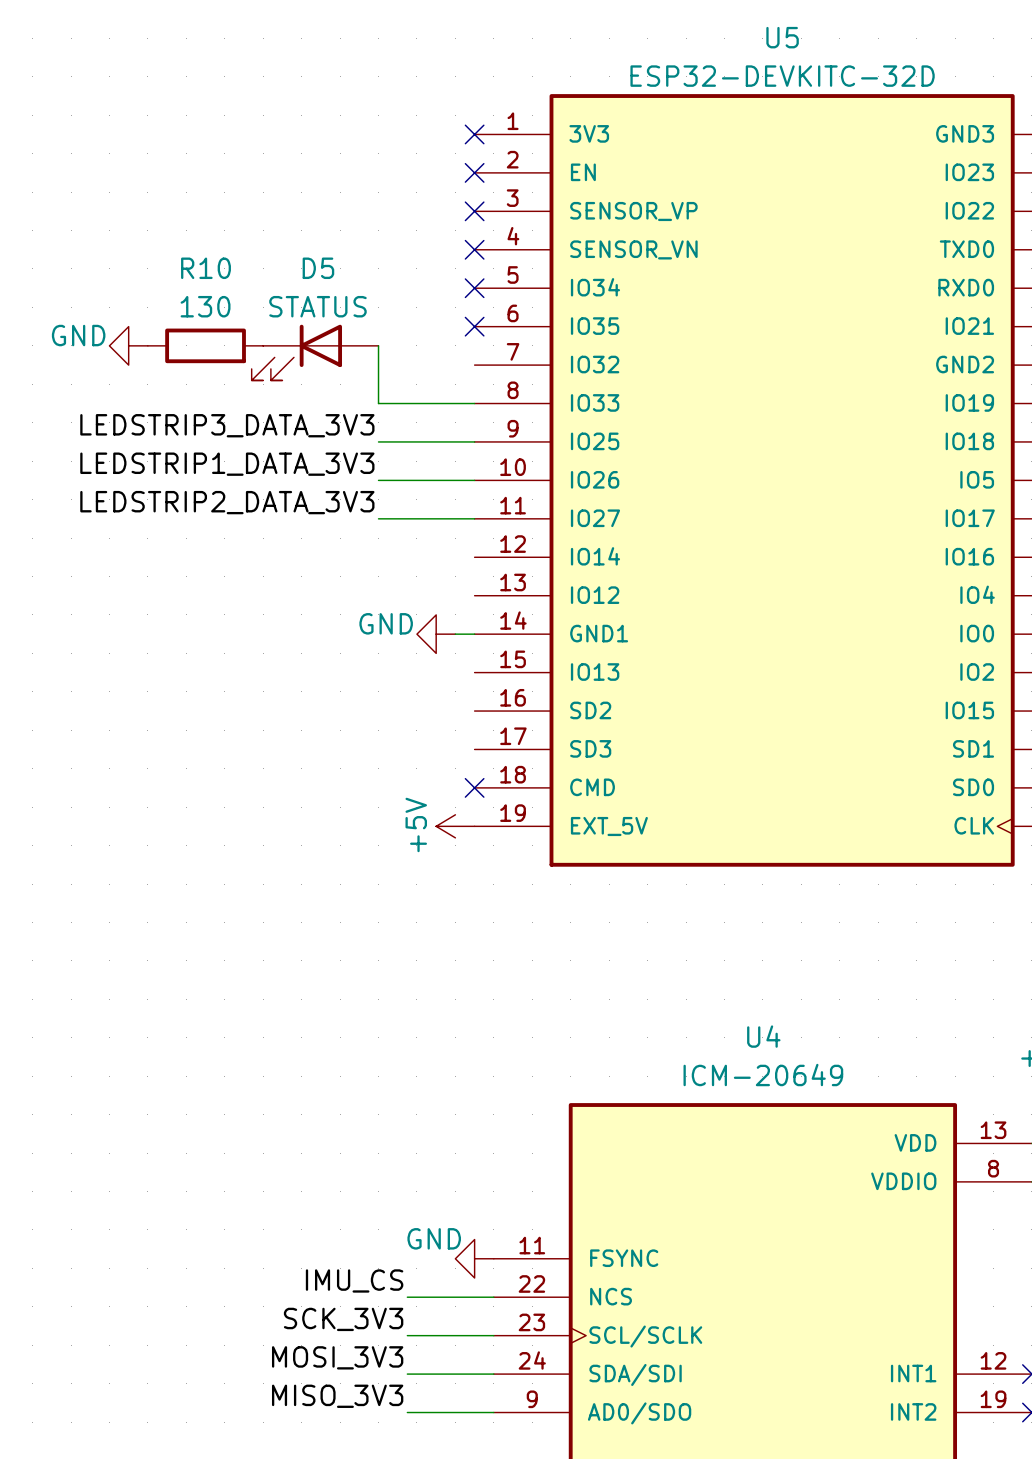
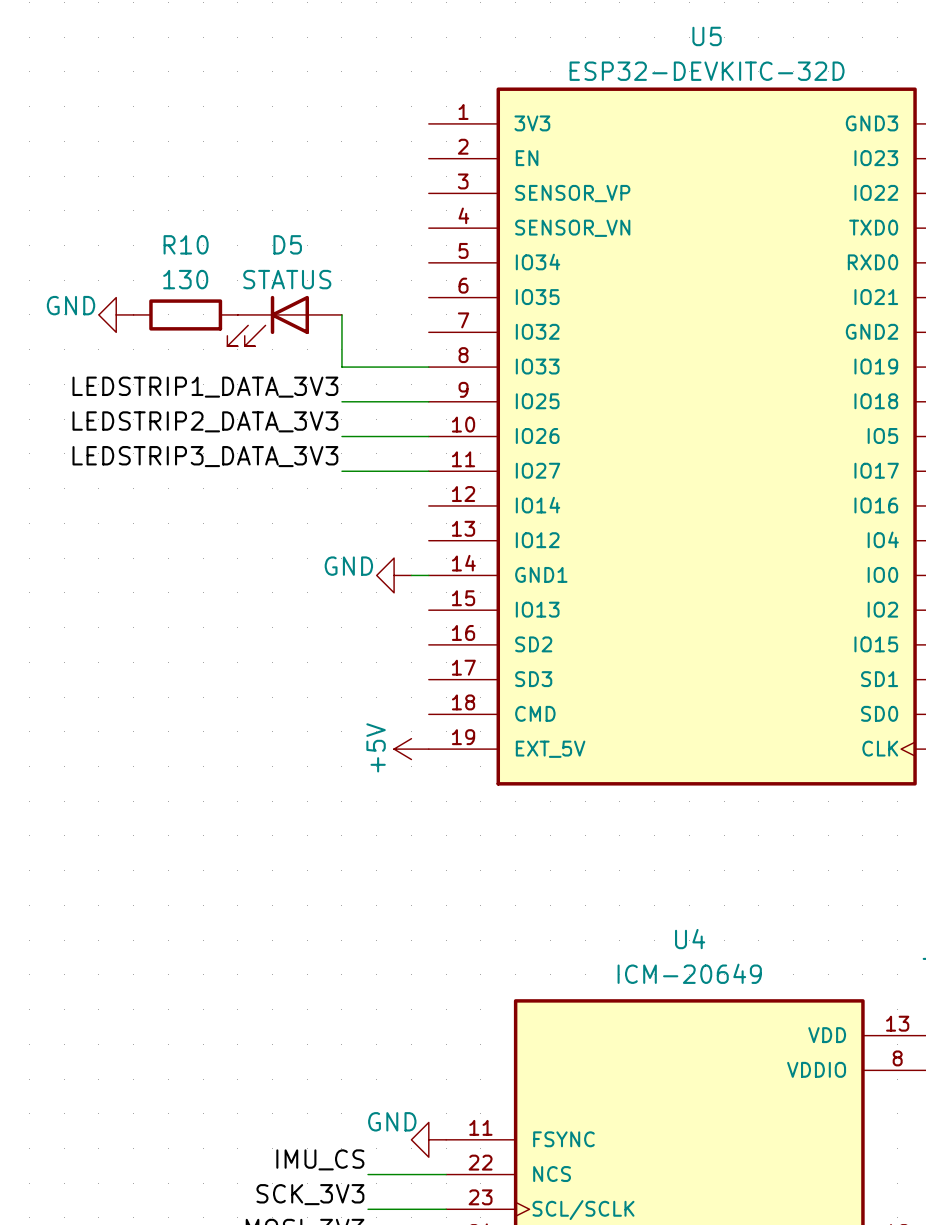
no-connect mark: (474, 134) -> none
no-connect mark: (474, 172) -> none
no-connect mark: (474, 211) -> none
no-connect mark: (474, 249) -> none
no-connect mark: (474, 288) -> none
no-connect mark: (474, 326) -> none
label: LEDSTRIP3_DATA_3V3 (227, 425) -> LEDSTRIP1_DATA_3V3 (205, 387)
label: LEDSTRIP1_DATA_3V3 (227, 464) -> LEDSTRIP2_DATA_3V3 (205, 421)
label: LEDSTRIP2_DATA_3V3 (227, 502) -> LEDSTRIP3_DATA_3V3 (205, 456)
no-connect mark: (474, 787) -> none

